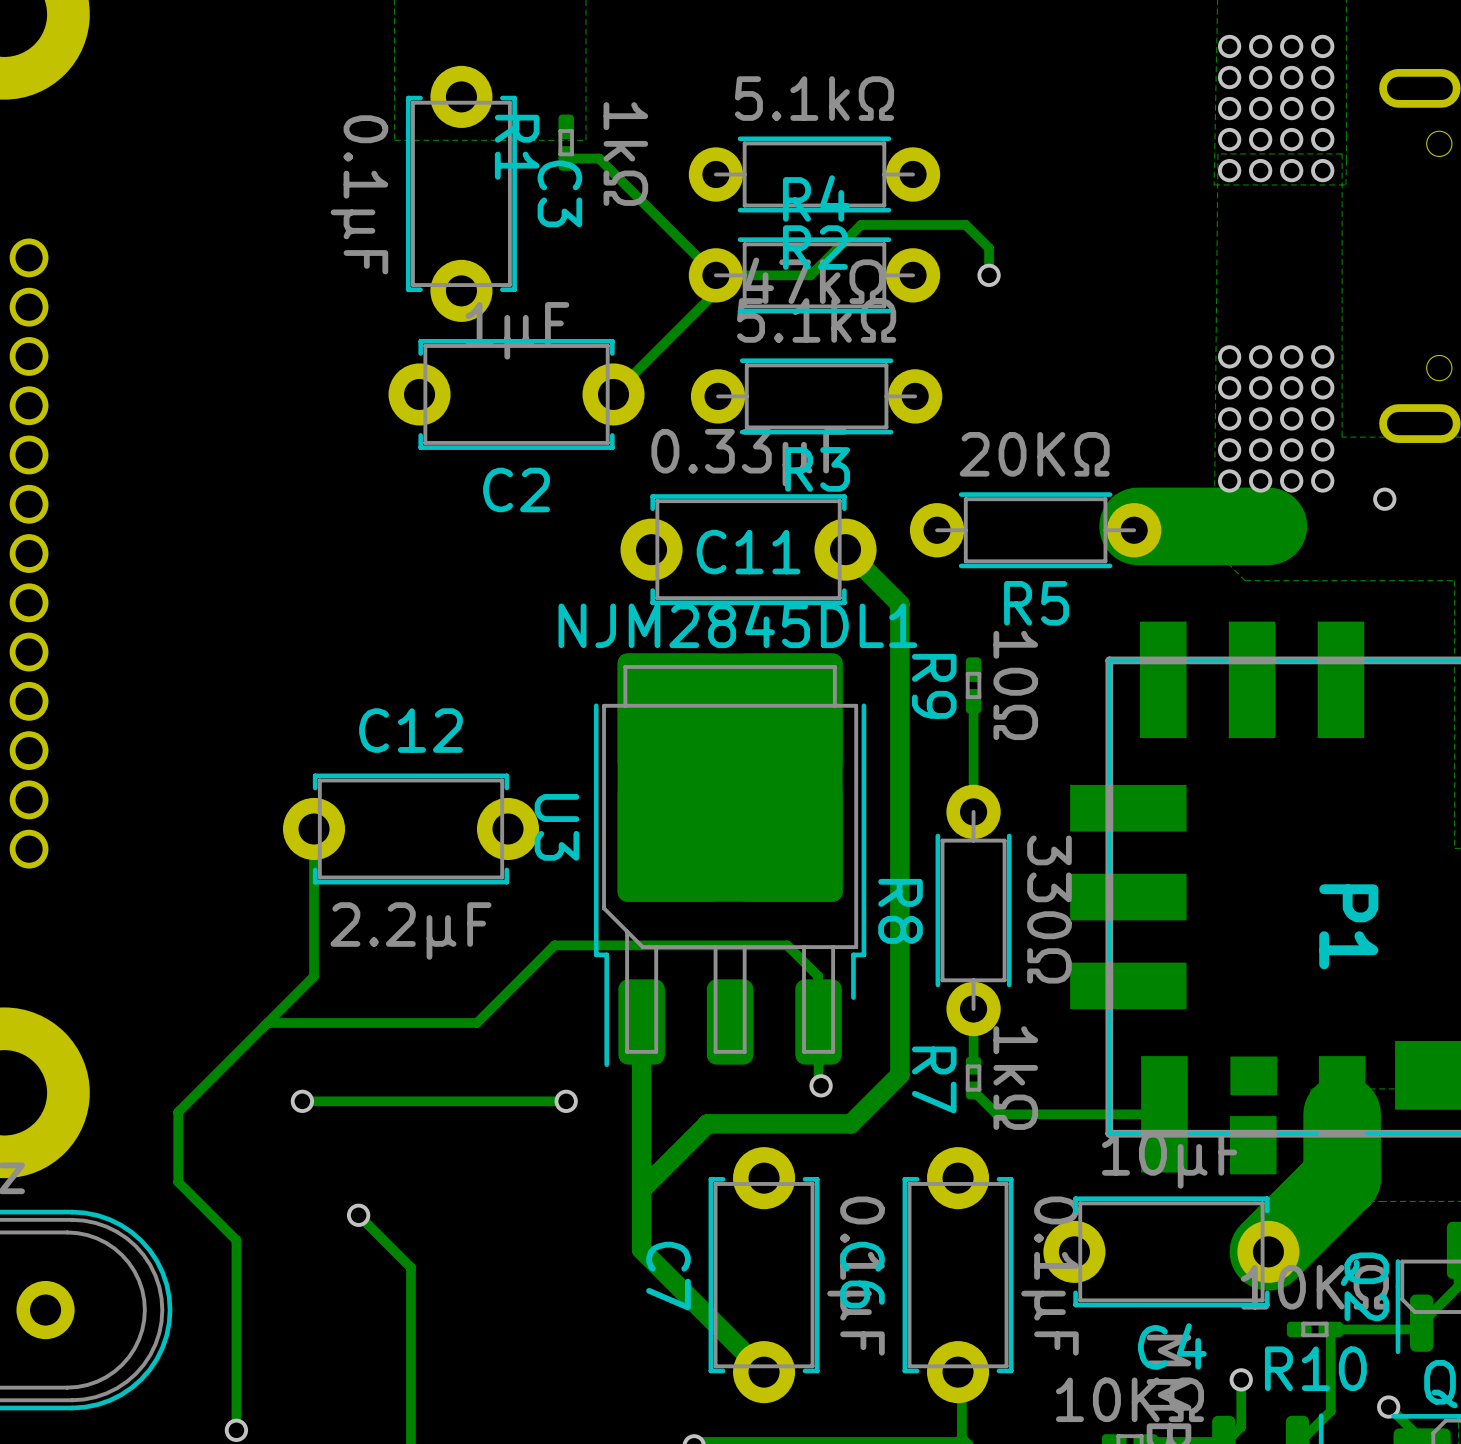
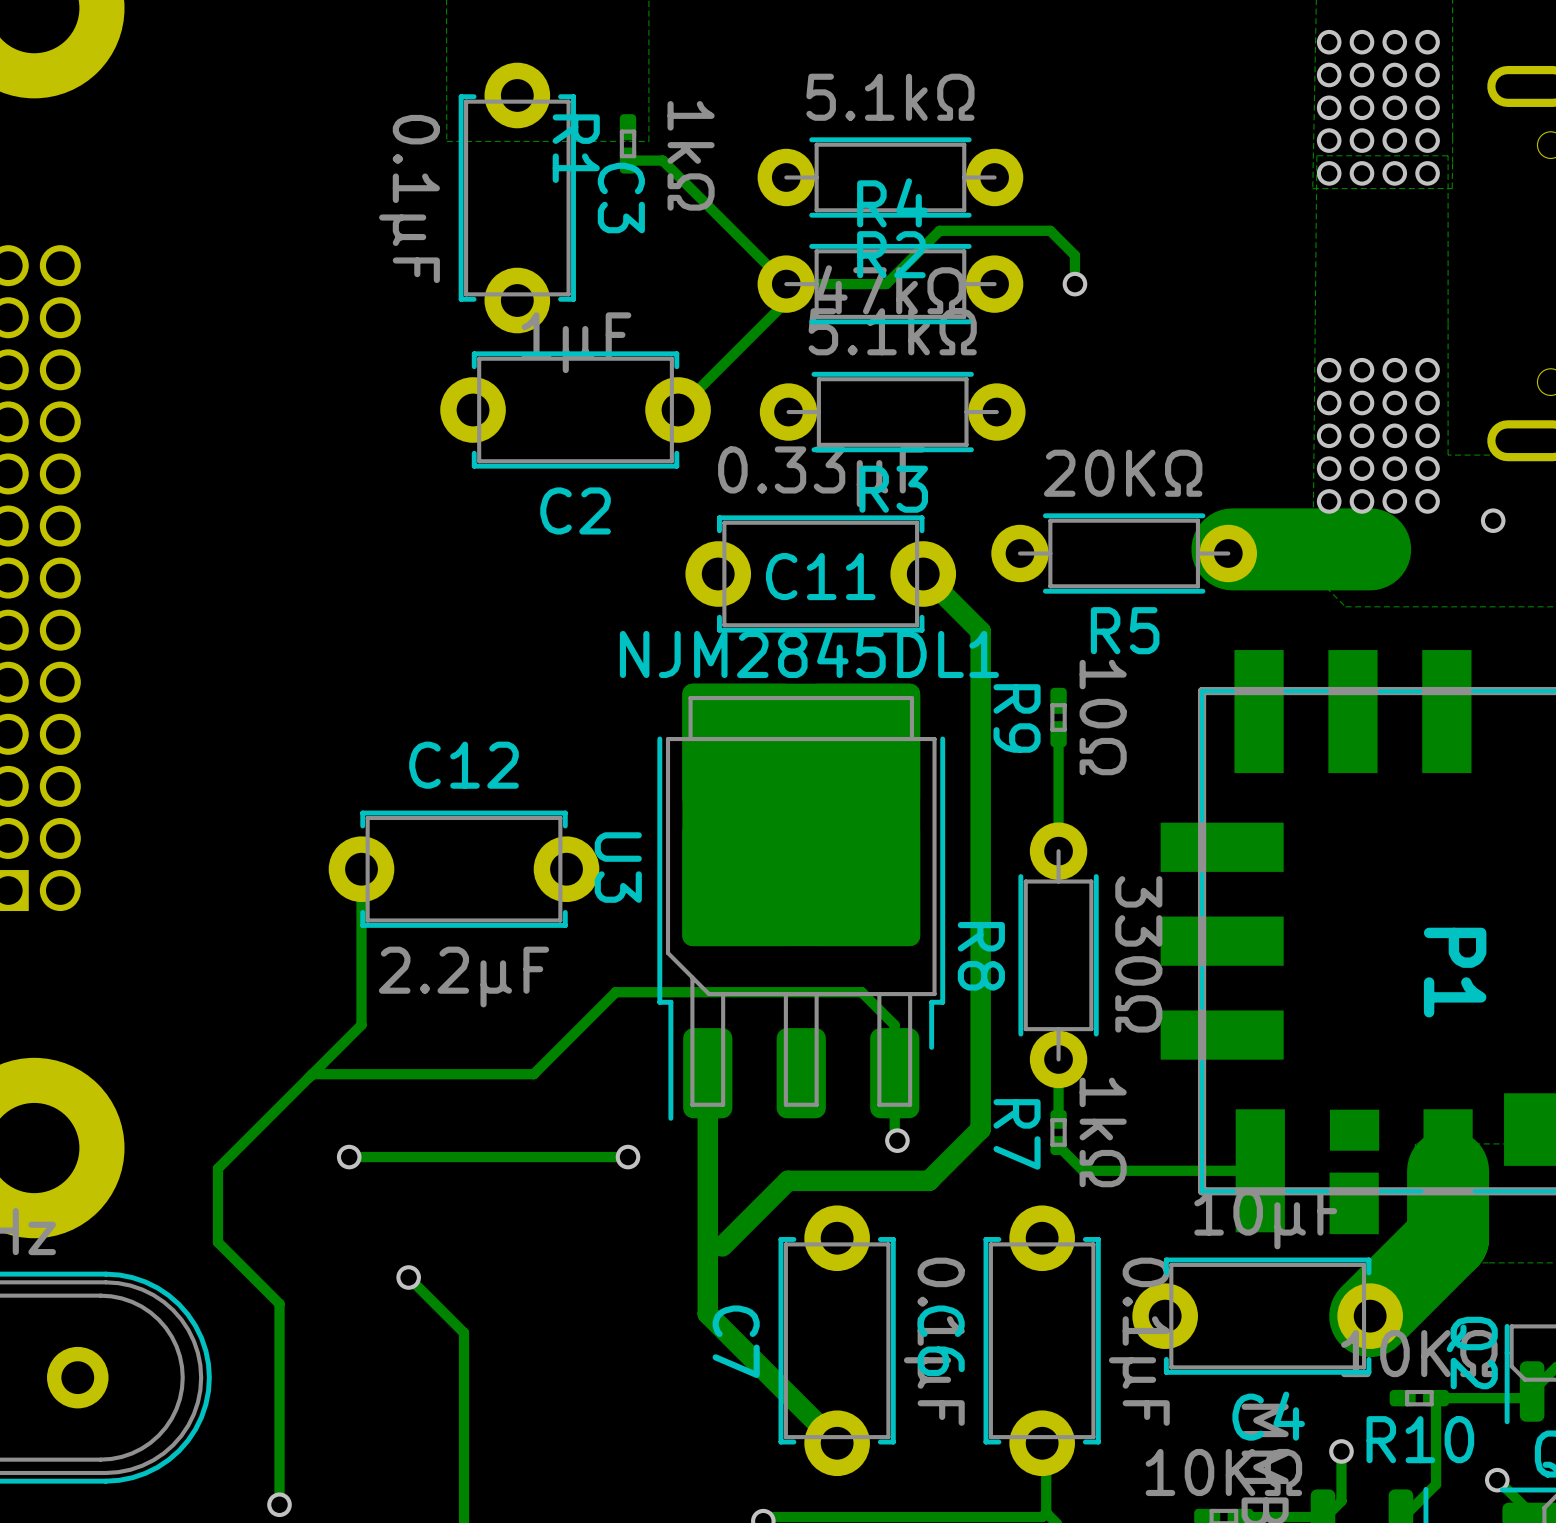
track: (717, 1123) (707, 1123) (641, 1189) -> (787, 1180) (722, 1246)

